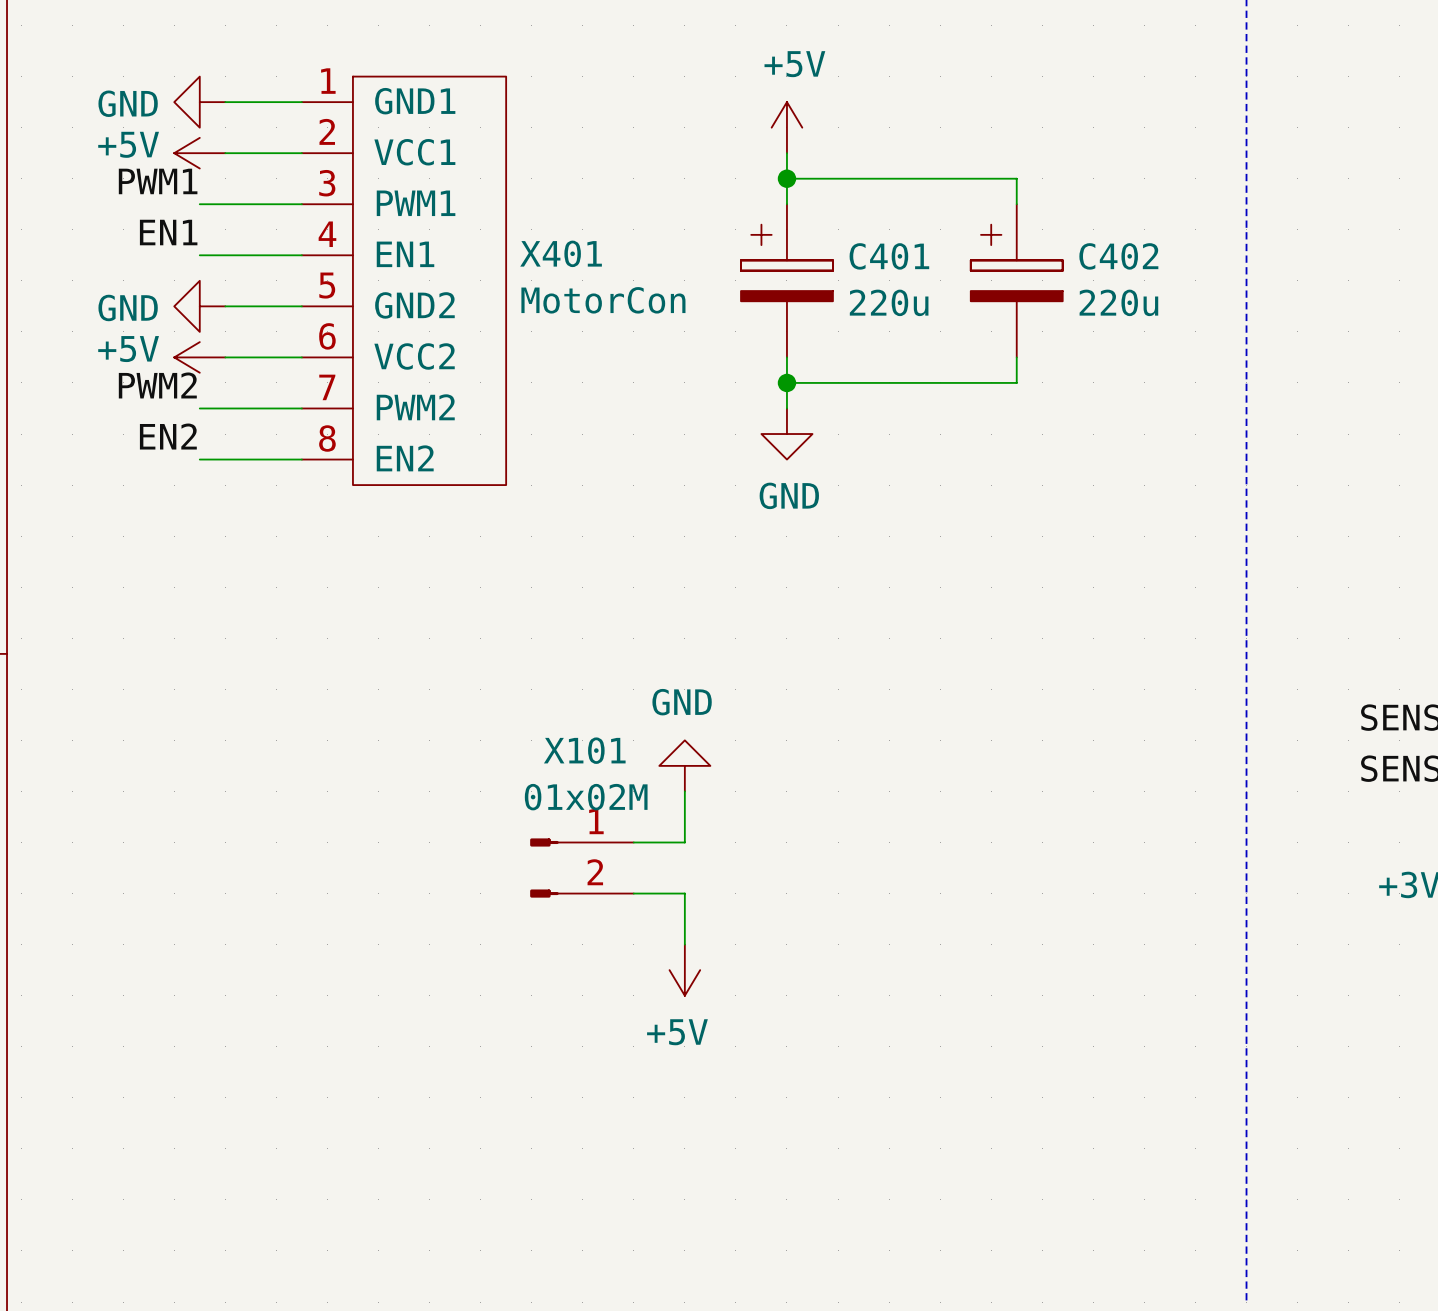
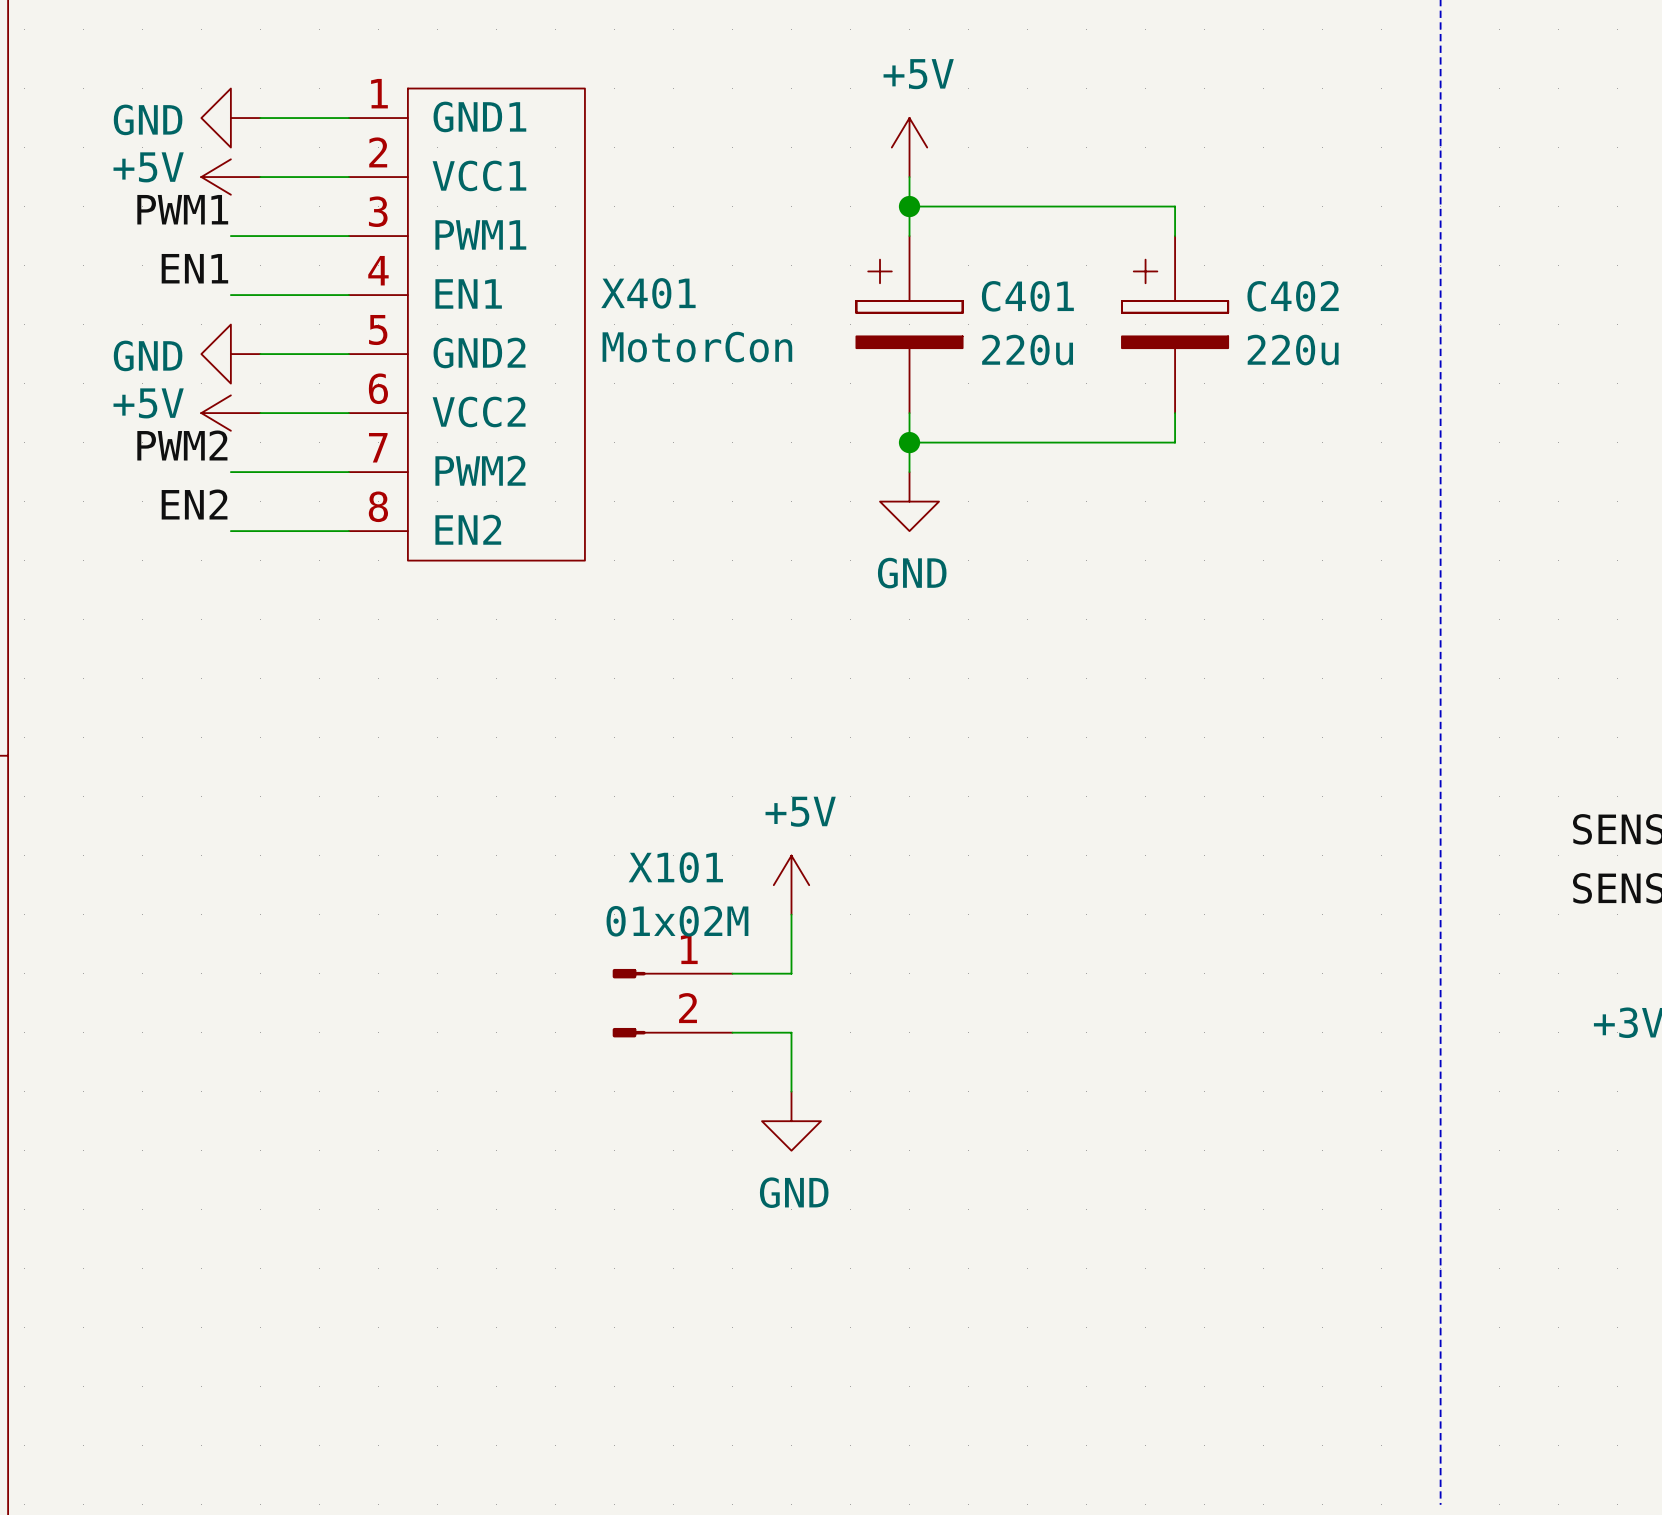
power symbol: GND (684, 765) -> +5V (791, 885)
power symbol: +5V (684, 970) -> GND (791, 1121)

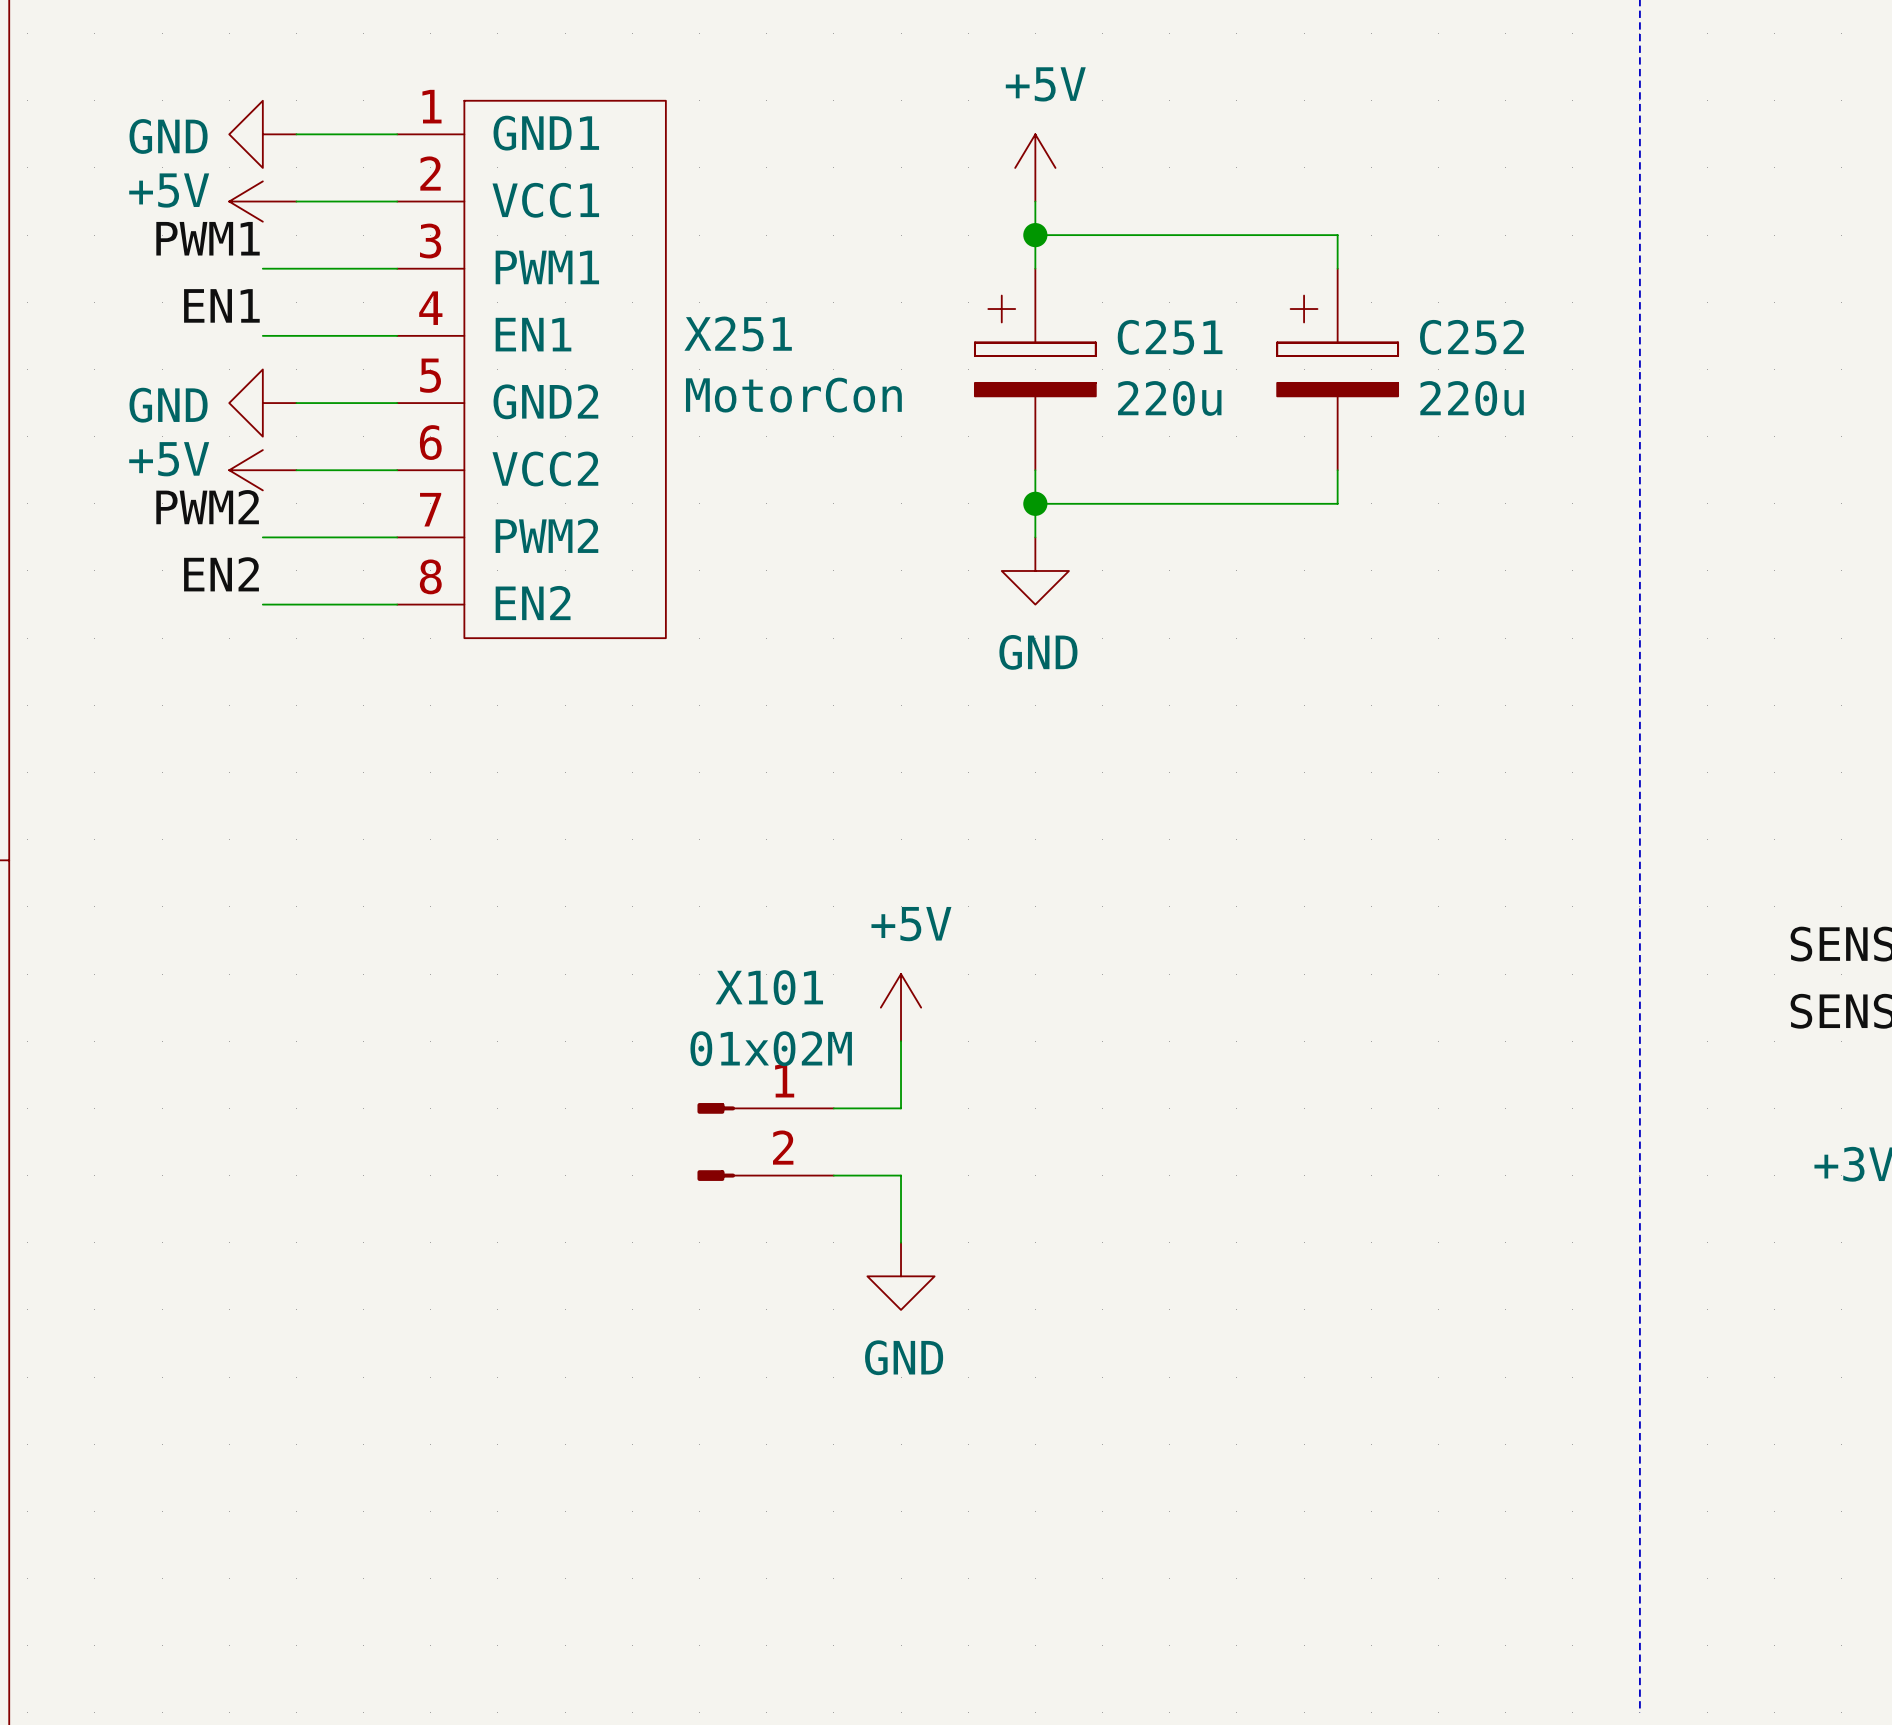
X401 name: X401 (648, 293) -> X251 (738, 333)
C401 name: C401 (1027, 296) -> C251 (1170, 337)
C402 name: C402 (1293, 296) -> C252 (1471, 337)

